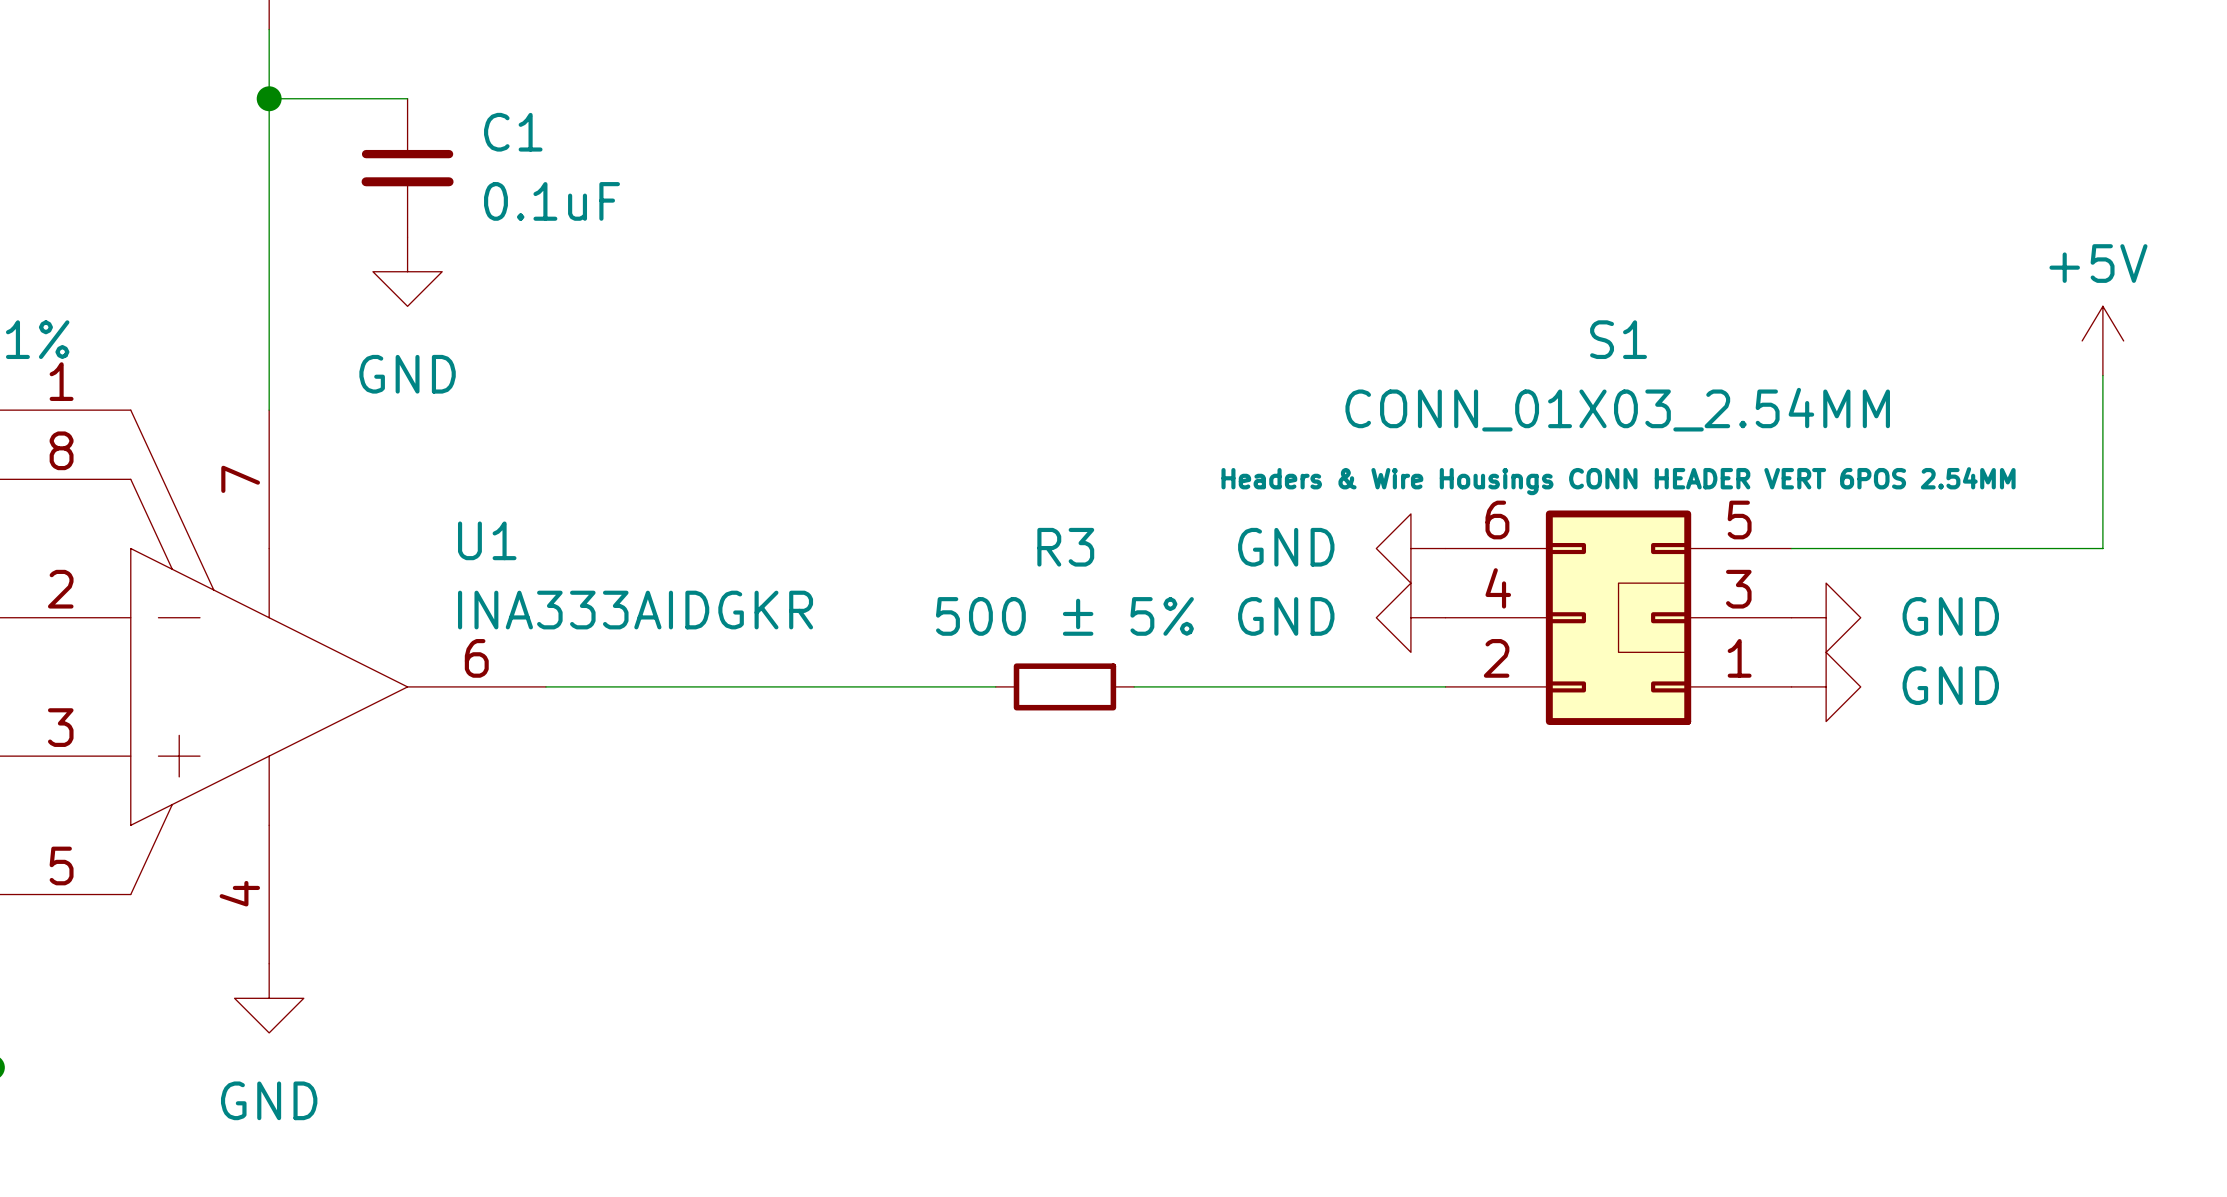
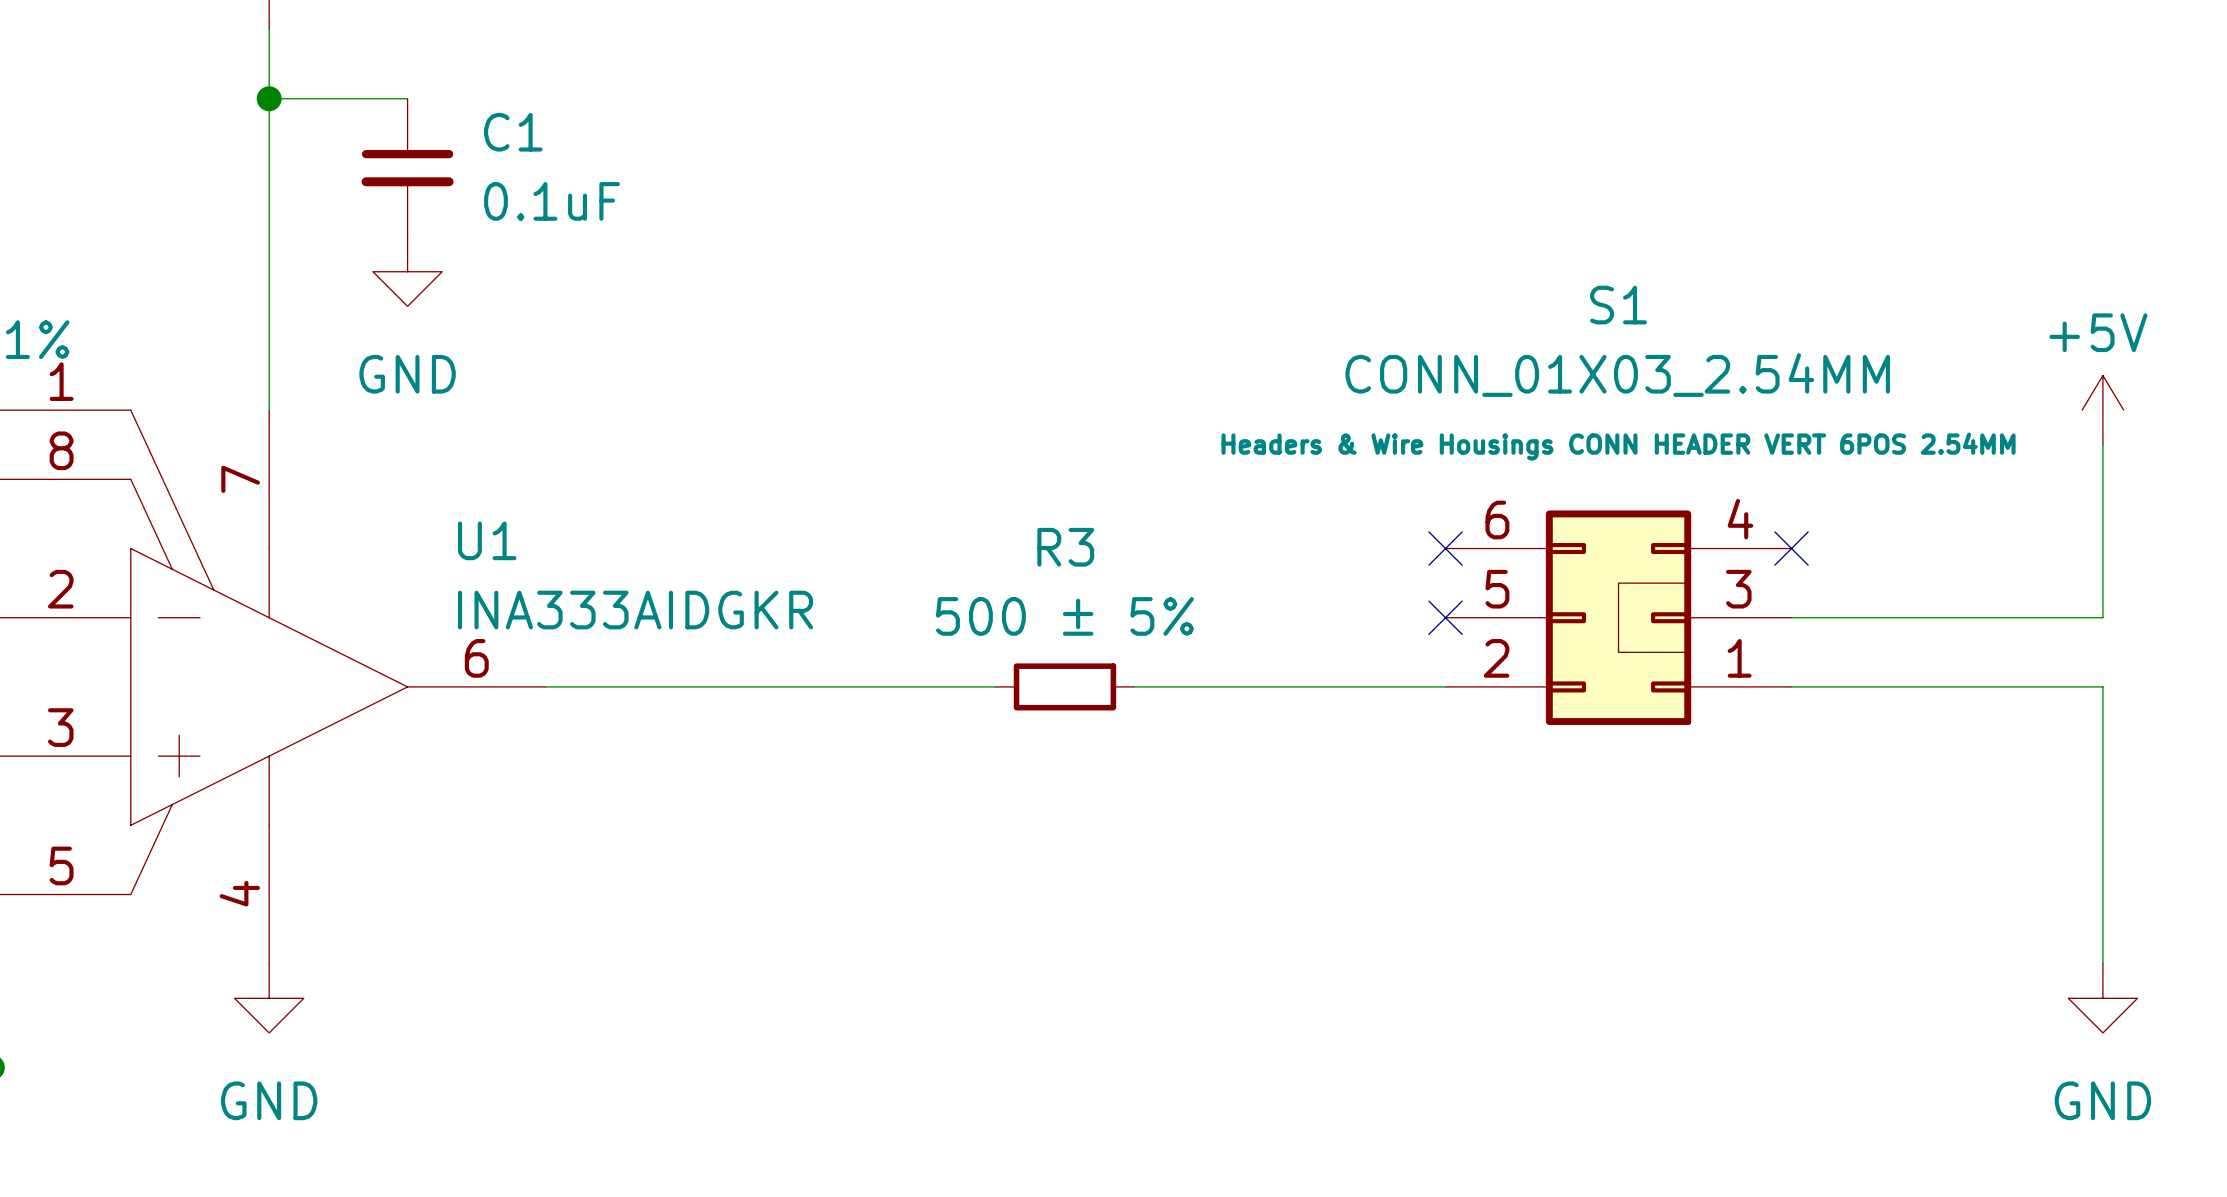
S1 name position: S1 (1618, 339) -> S1 (1618, 305)
power symbol position: +5V (2102, 340) -> +5V (2102, 410)
S1 value position: CONN_01X03_2.54MM (1617, 409) -> CONN_01X03_2.54MM (1617, 375)
S1 text position: Headers & Wire Housings CONN HEADER VERT 6POS 2.54MM (1618, 481) -> Headers & Wire Housings CONN HEADER VERT 6POS 2.54MM (1618, 446)
S1 pin number: 5 (1739, 519) -> 4 (1740, 519)
power symbol: GND (1410, 548) -> none
no-connect mark: none -> (1445, 548)
wire: (1791, 548) (2102, 548) -> (1791, 617) (2102, 617) (2102, 548)
no-connect mark: none -> (1791, 548)
S1 pin number: 4 (1498, 588) -> 5 (1497, 589)
power symbol: GND (1410, 617) -> none
no-connect mark: none -> (1445, 617)
power symbol: GND (1826, 617) -> none
wire: none -> (1791, 686) (2102, 686) (2102, 963)
power symbol: GND (1826, 686) -> none
power symbol: none -> GND (2102, 998)

